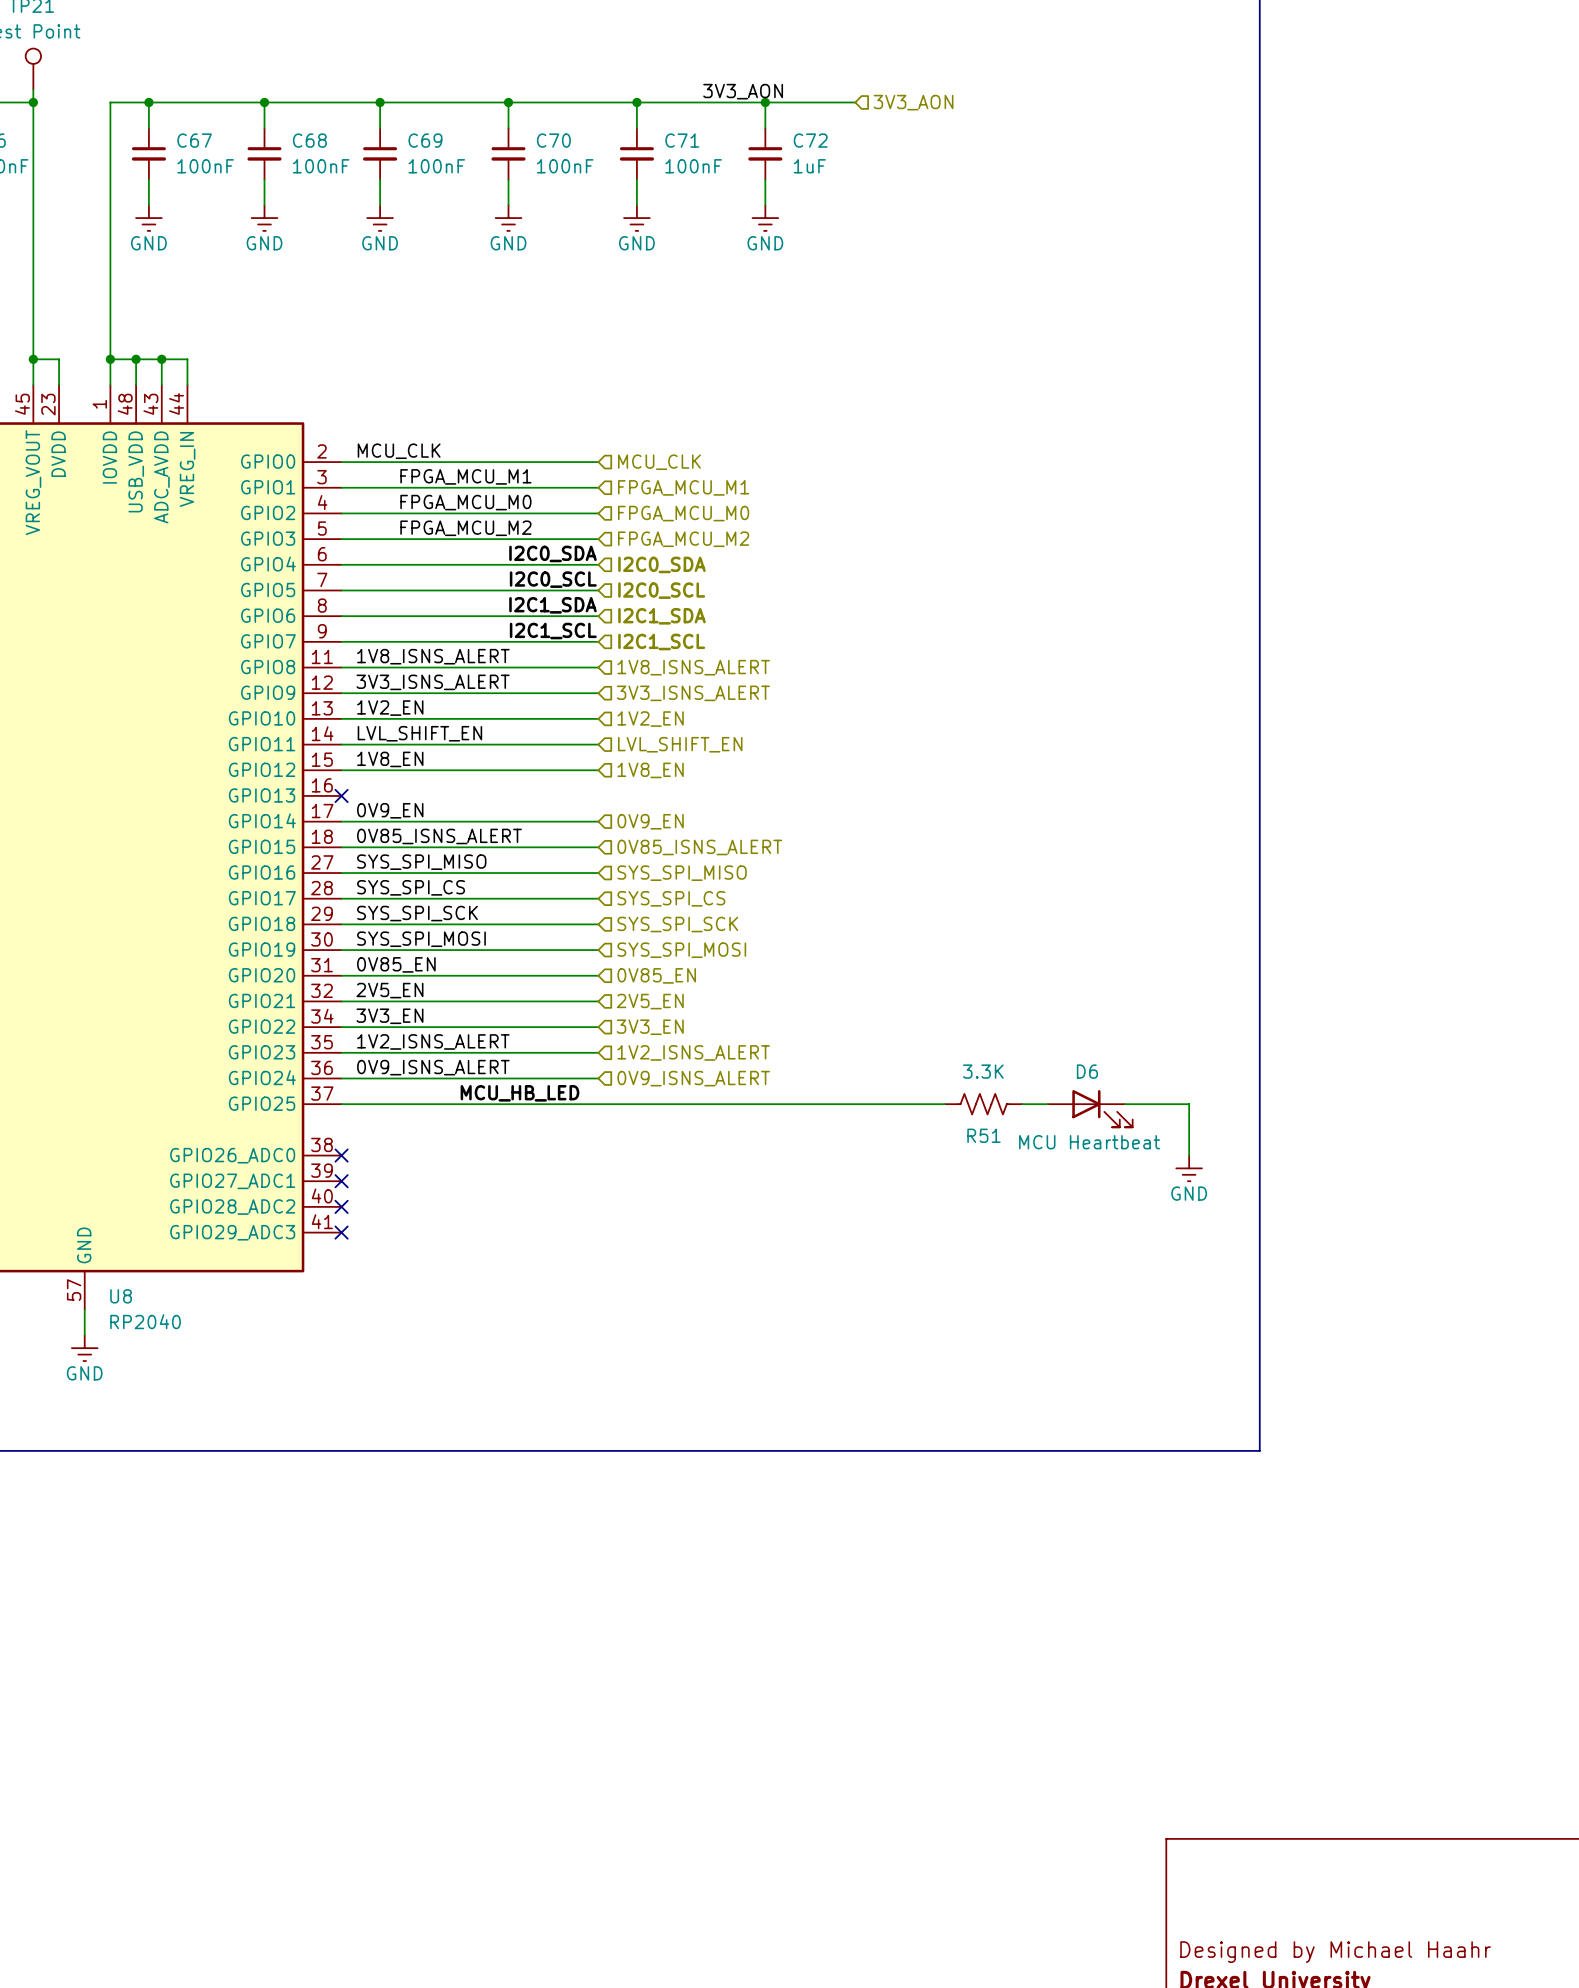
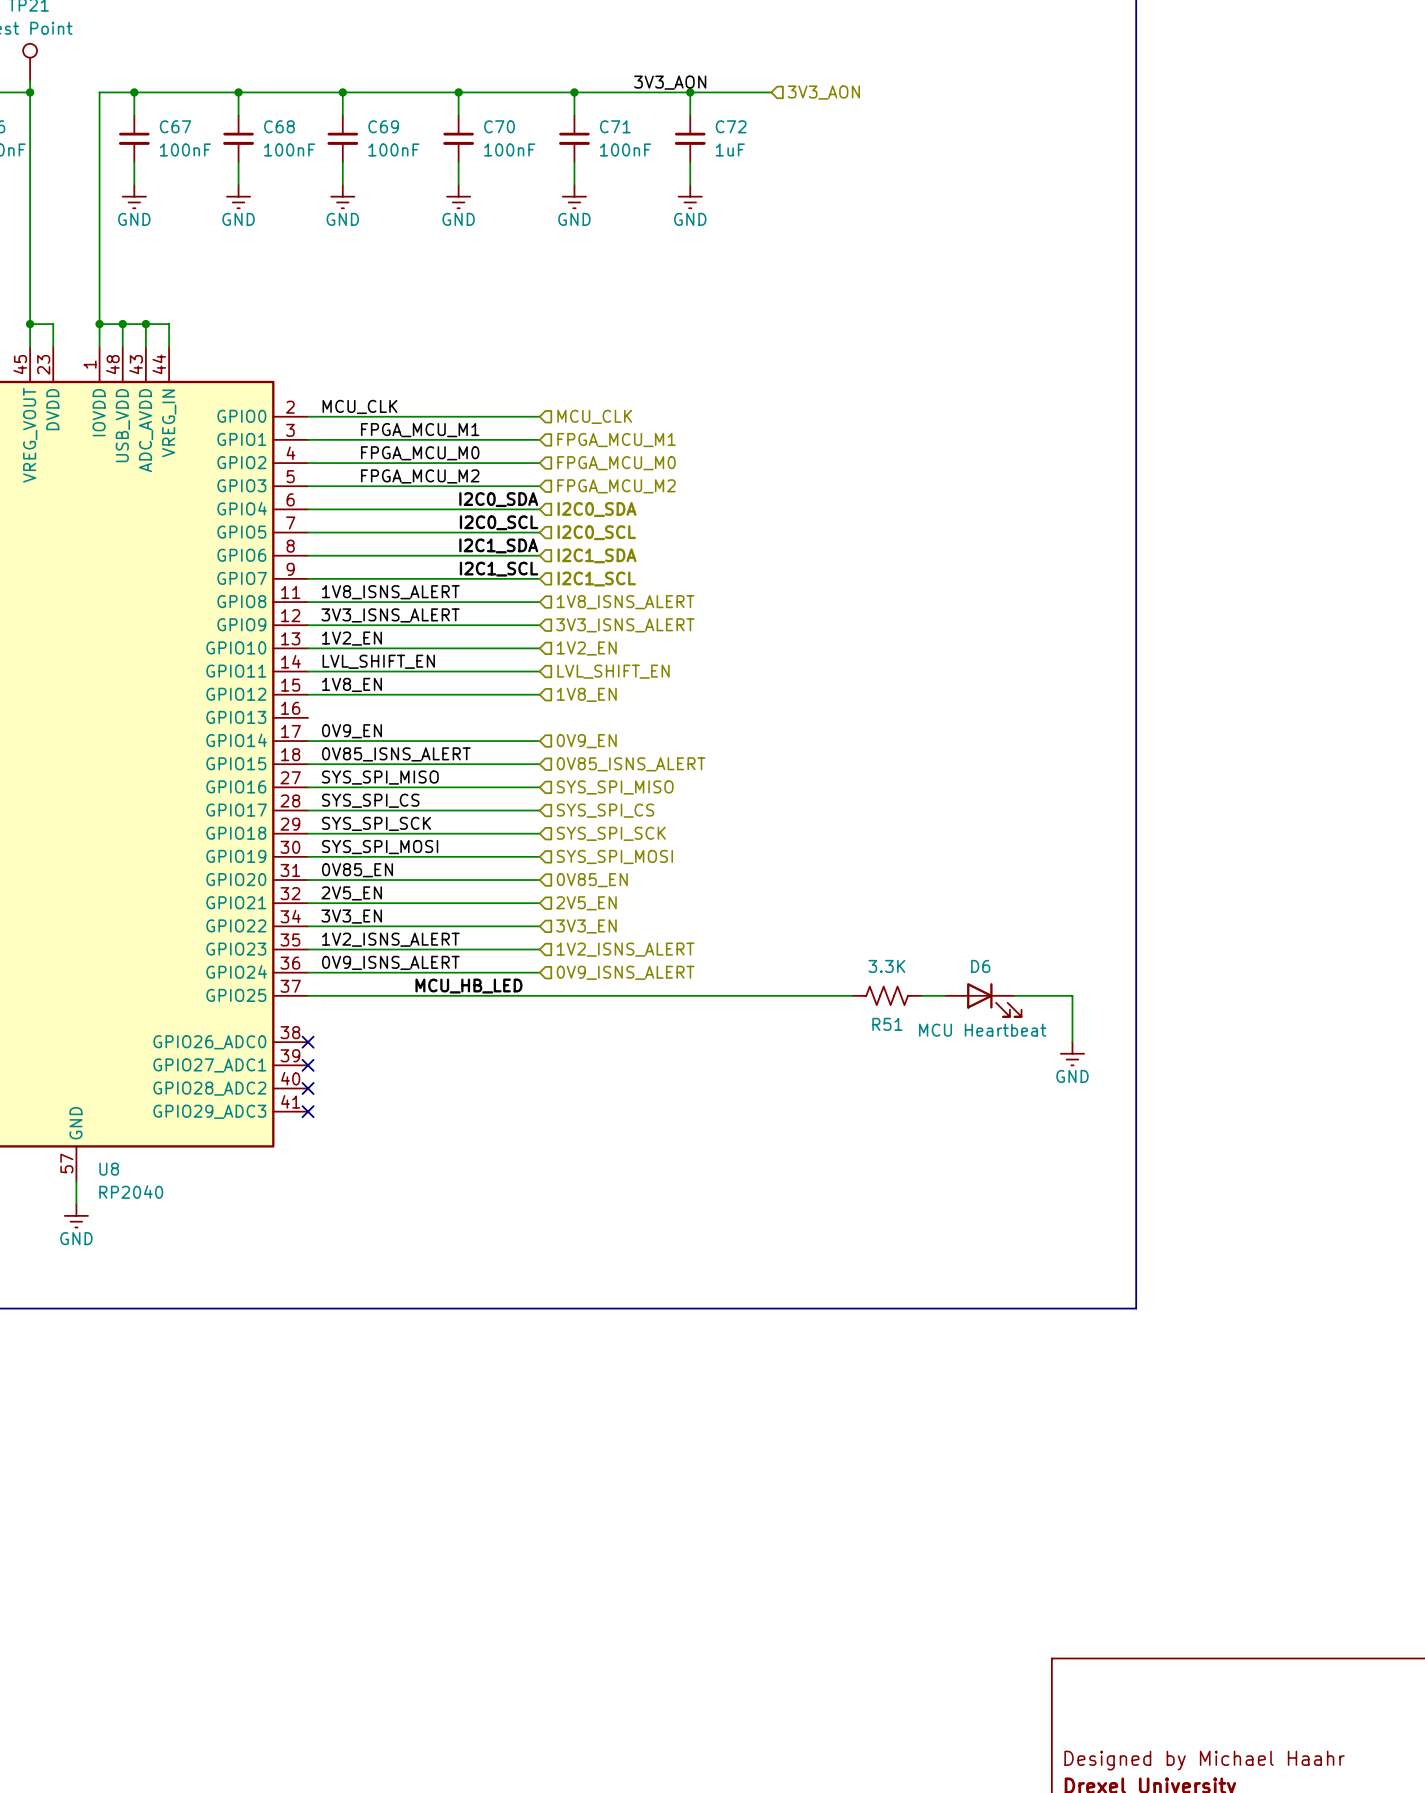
no-connect mark: (341, 795) -> none

